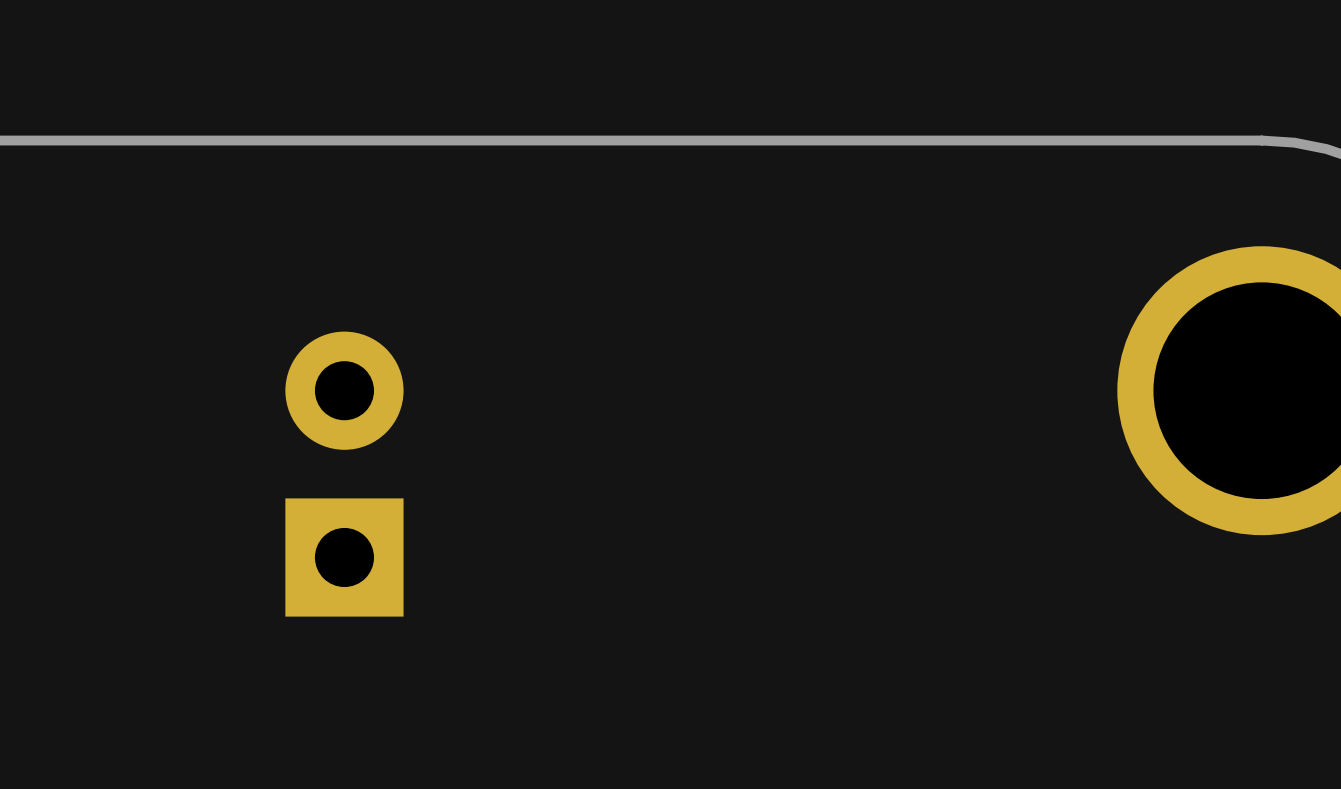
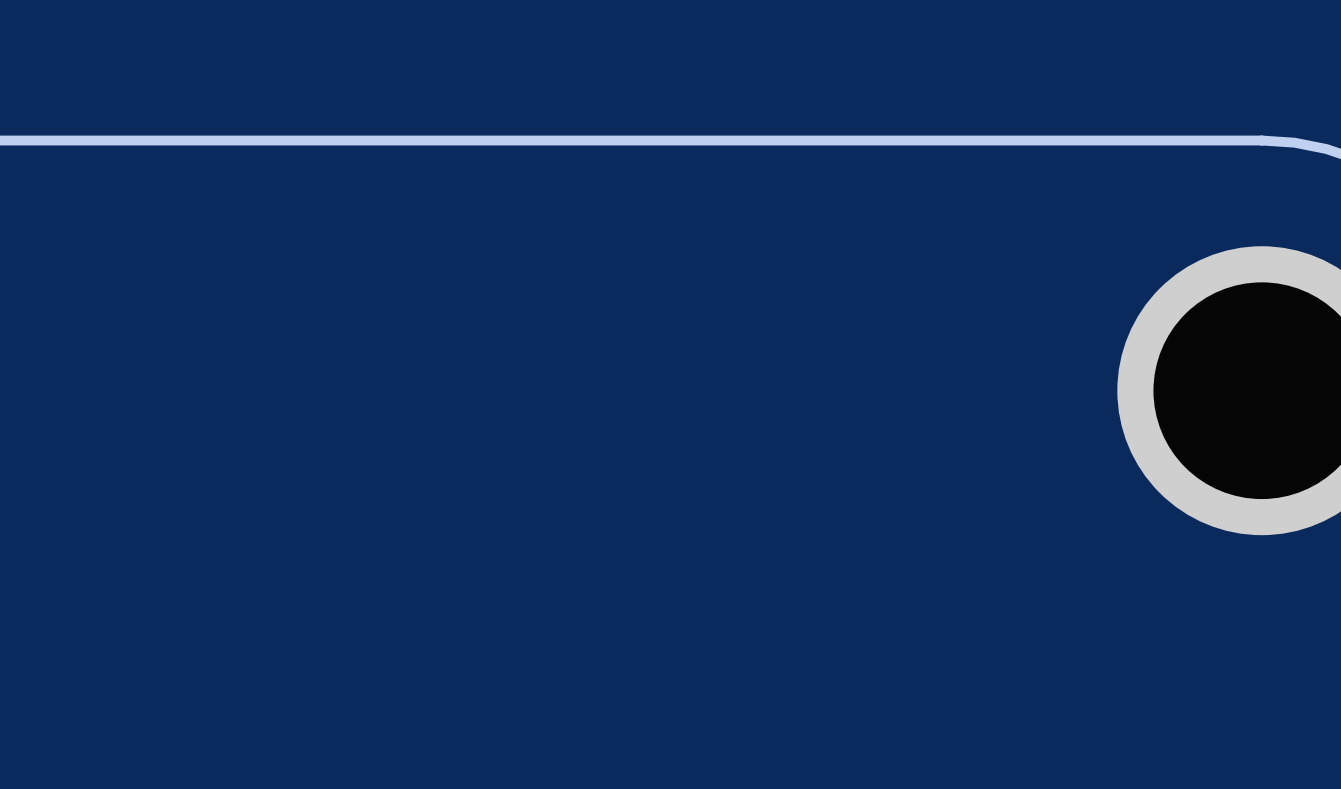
part: (344, 474) -> none

